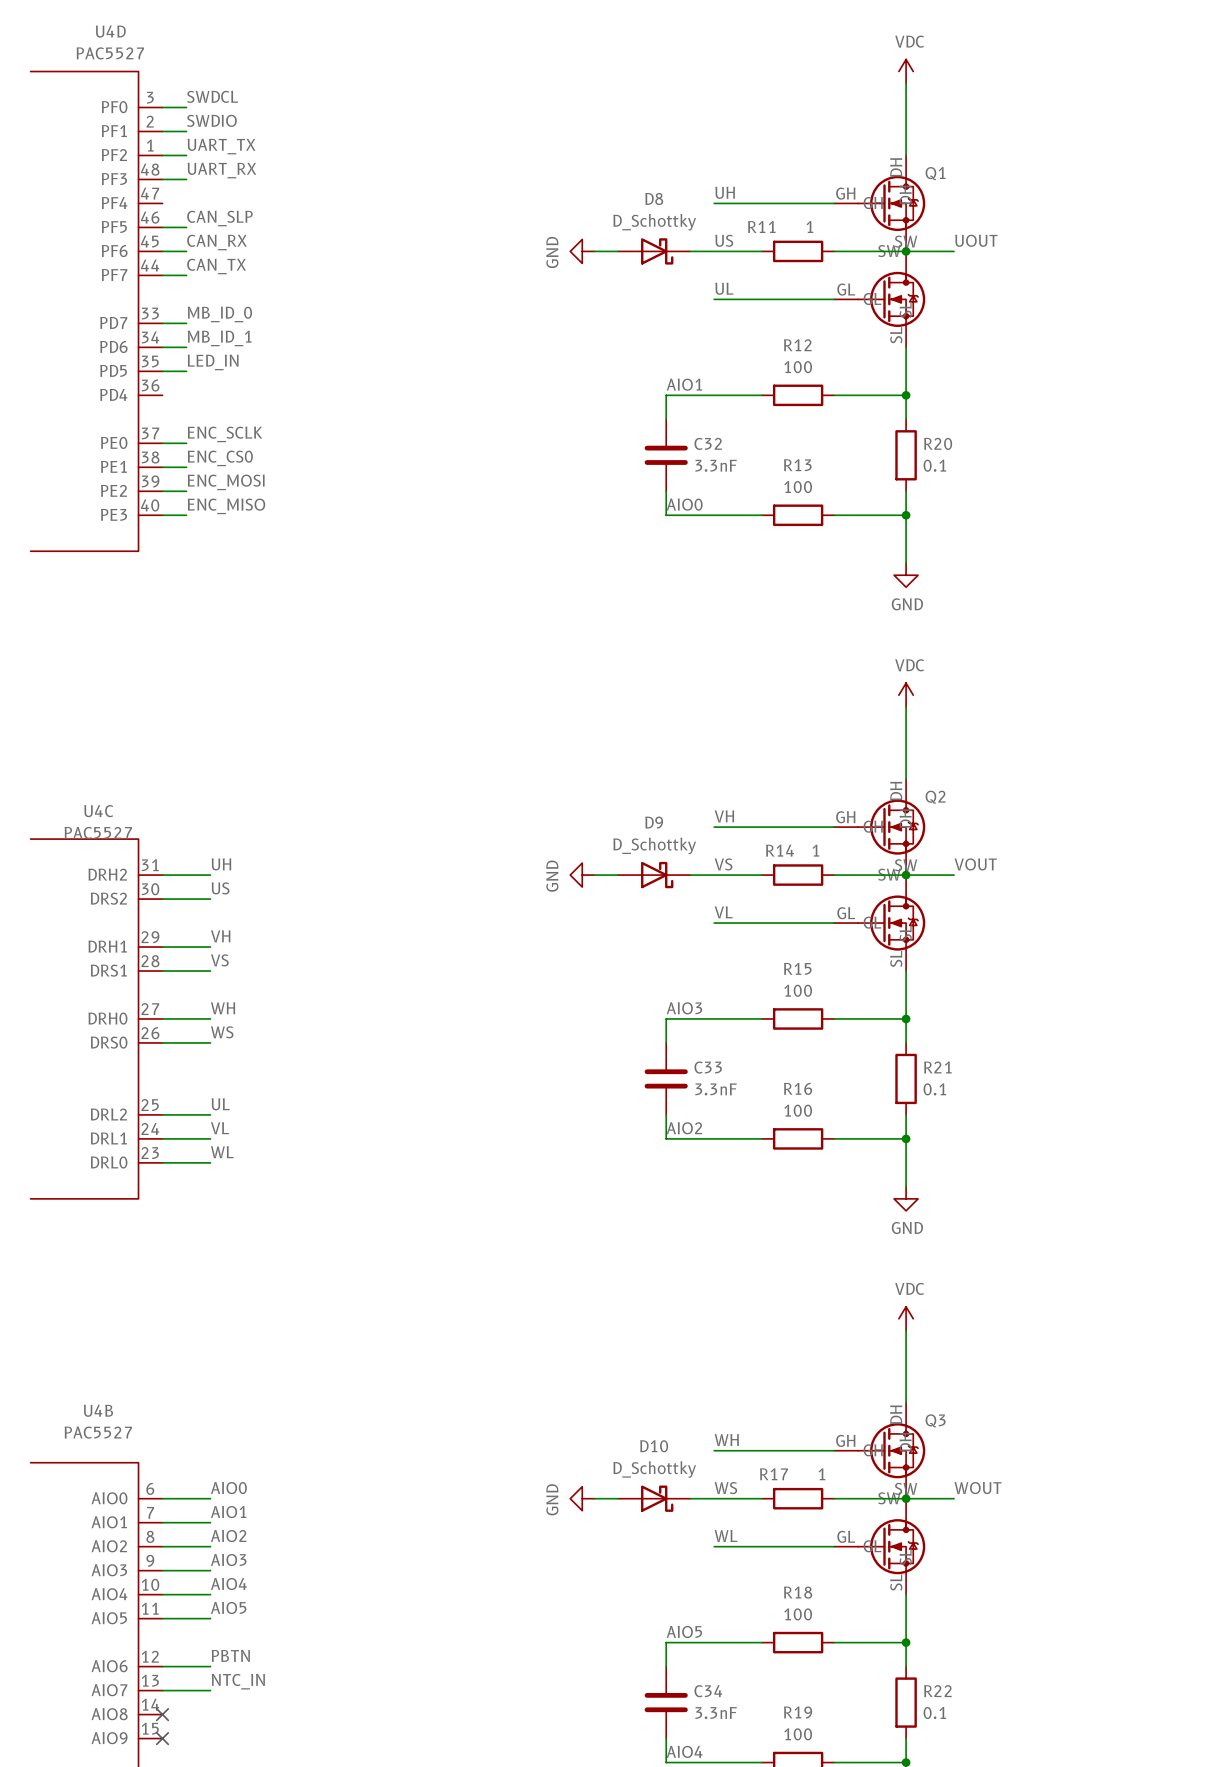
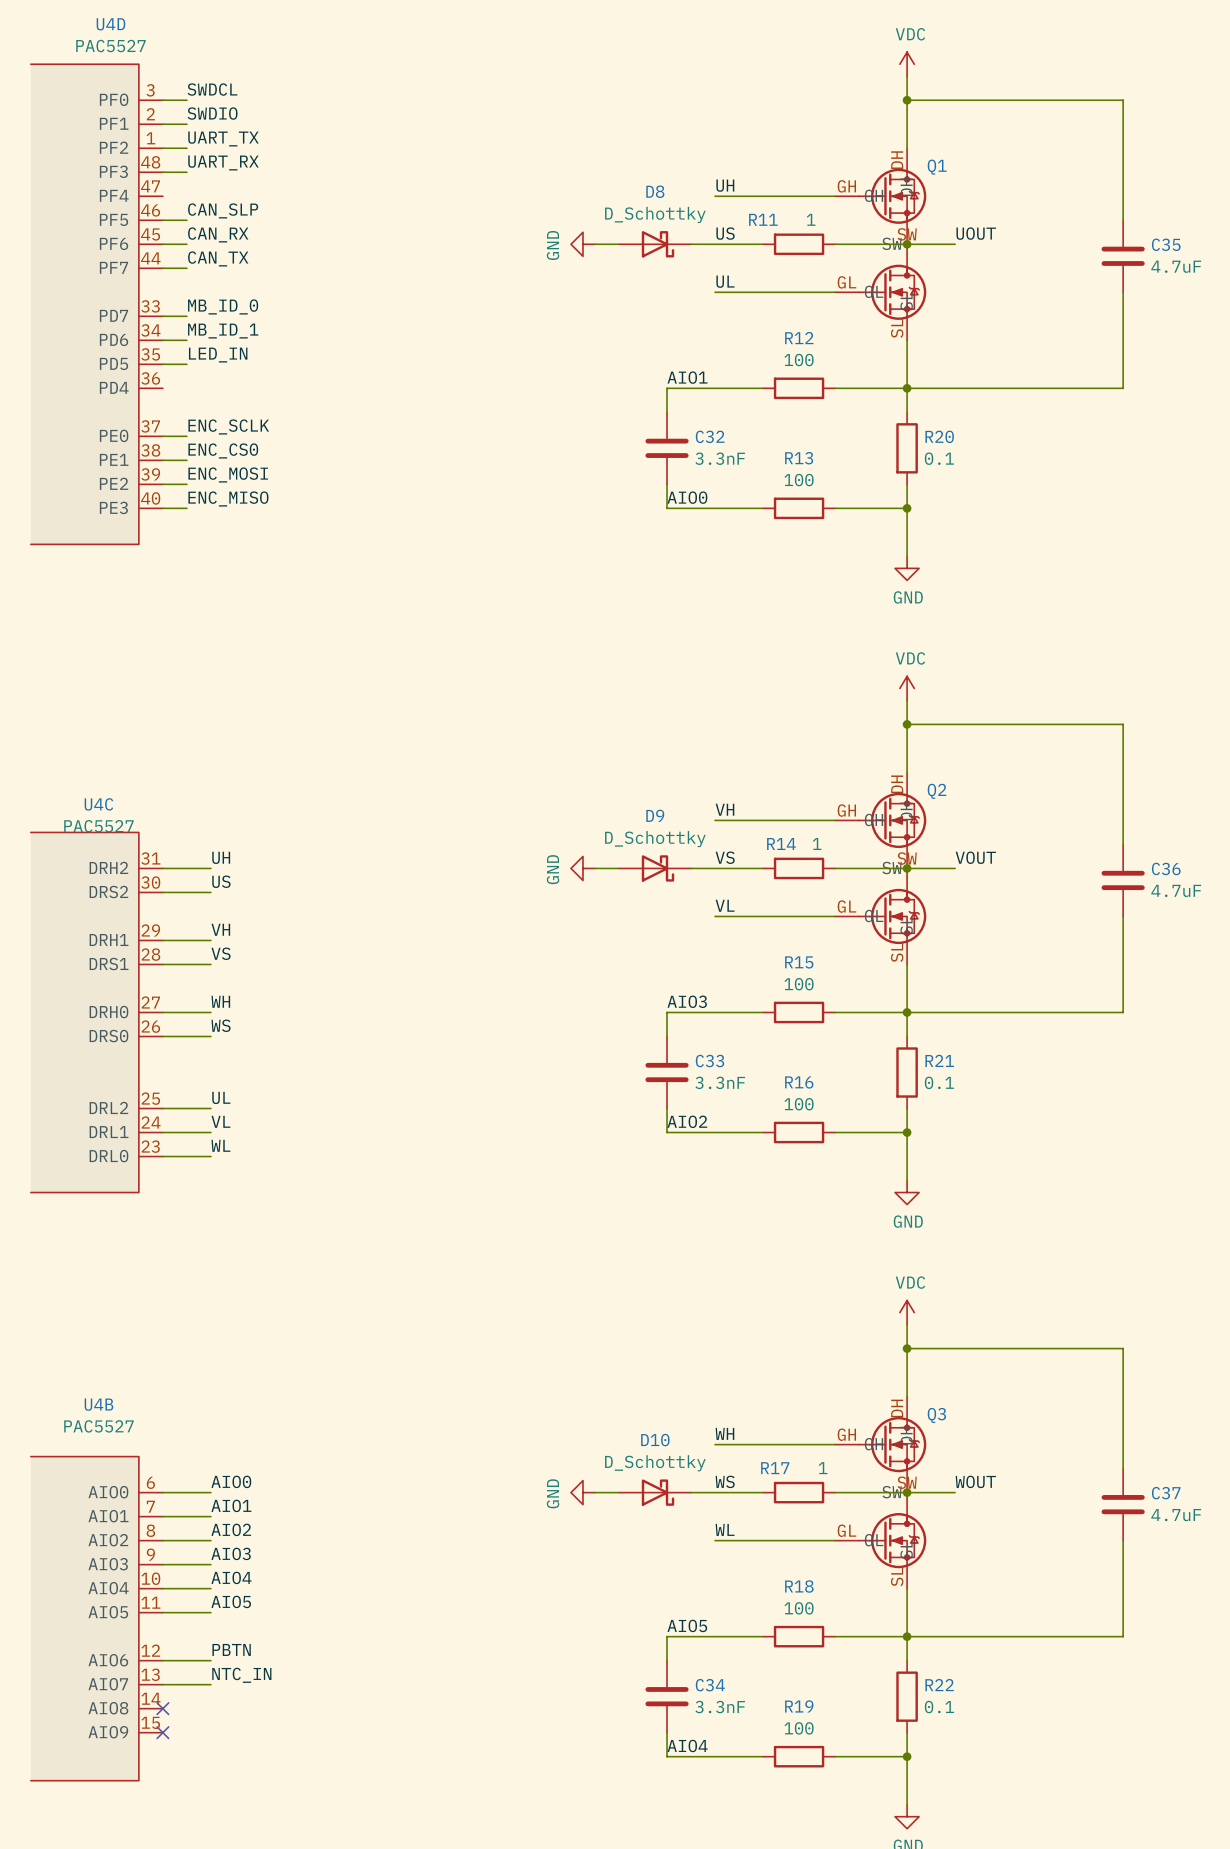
wire: none -> (907, 100) (1123, 100) (1123, 220)
junction: none -> (907, 100)
C35: none -> 4.7uF (1123, 256)
wire: none -> (1123, 292) (1123, 388) (907, 388)
wire: none -> (907, 724) (1123, 724) (1123, 844)
junction: none -> (907, 724)
C36: none -> 4.7uF (1123, 880)
wire: none -> (1123, 916) (1123, 1012) (907, 1012)
wire: none -> (907, 1348) (1123, 1348) (1123, 1468)
junction: none -> (907, 1348)
C37: none -> 4.7uF (1123, 1504)
wire: none -> (1123, 1540) (1123, 1636) (907, 1636)

